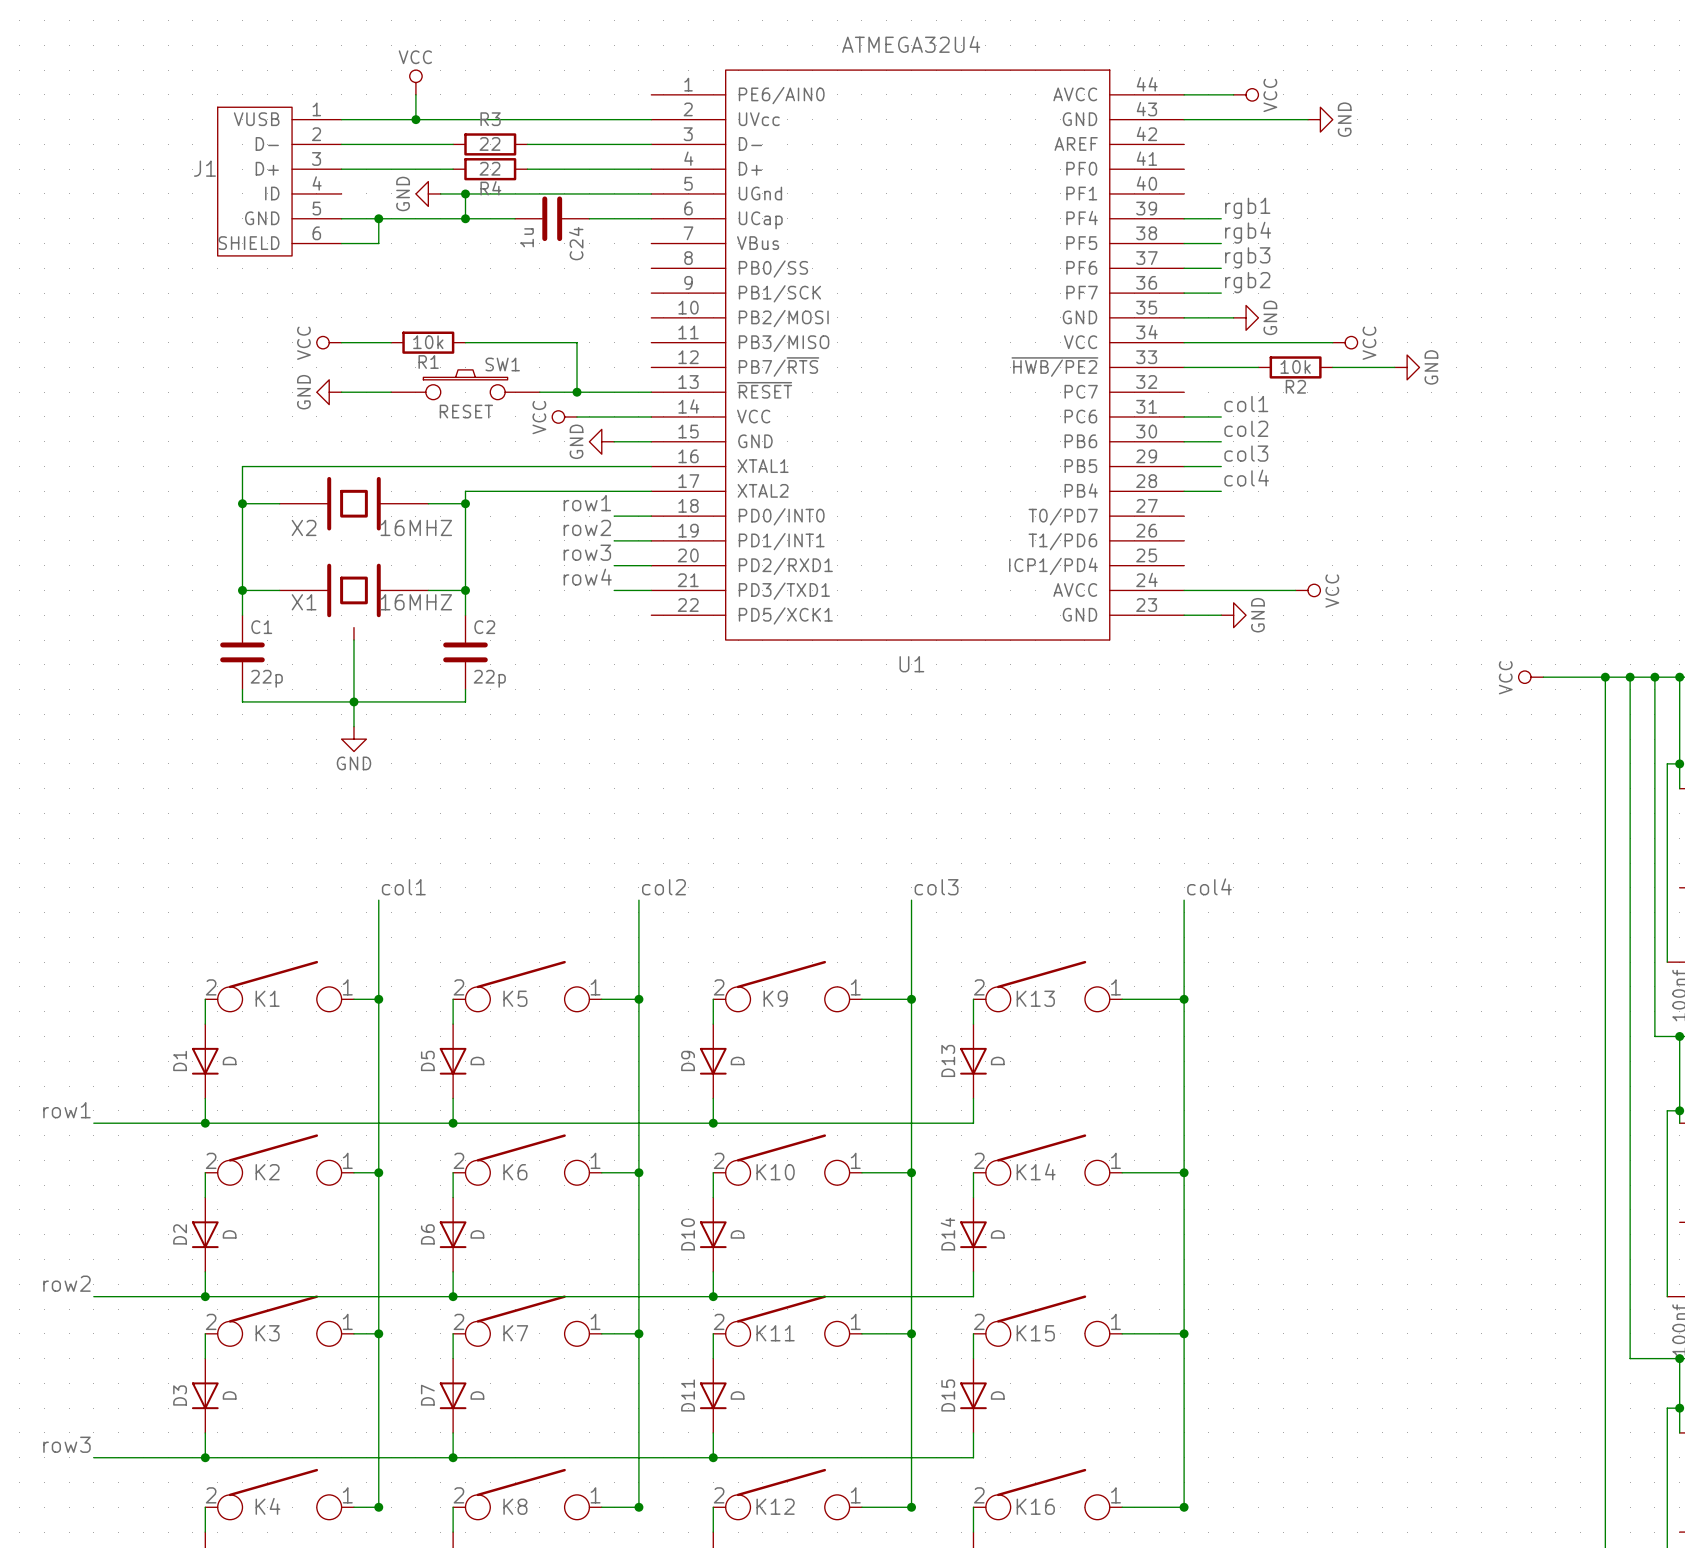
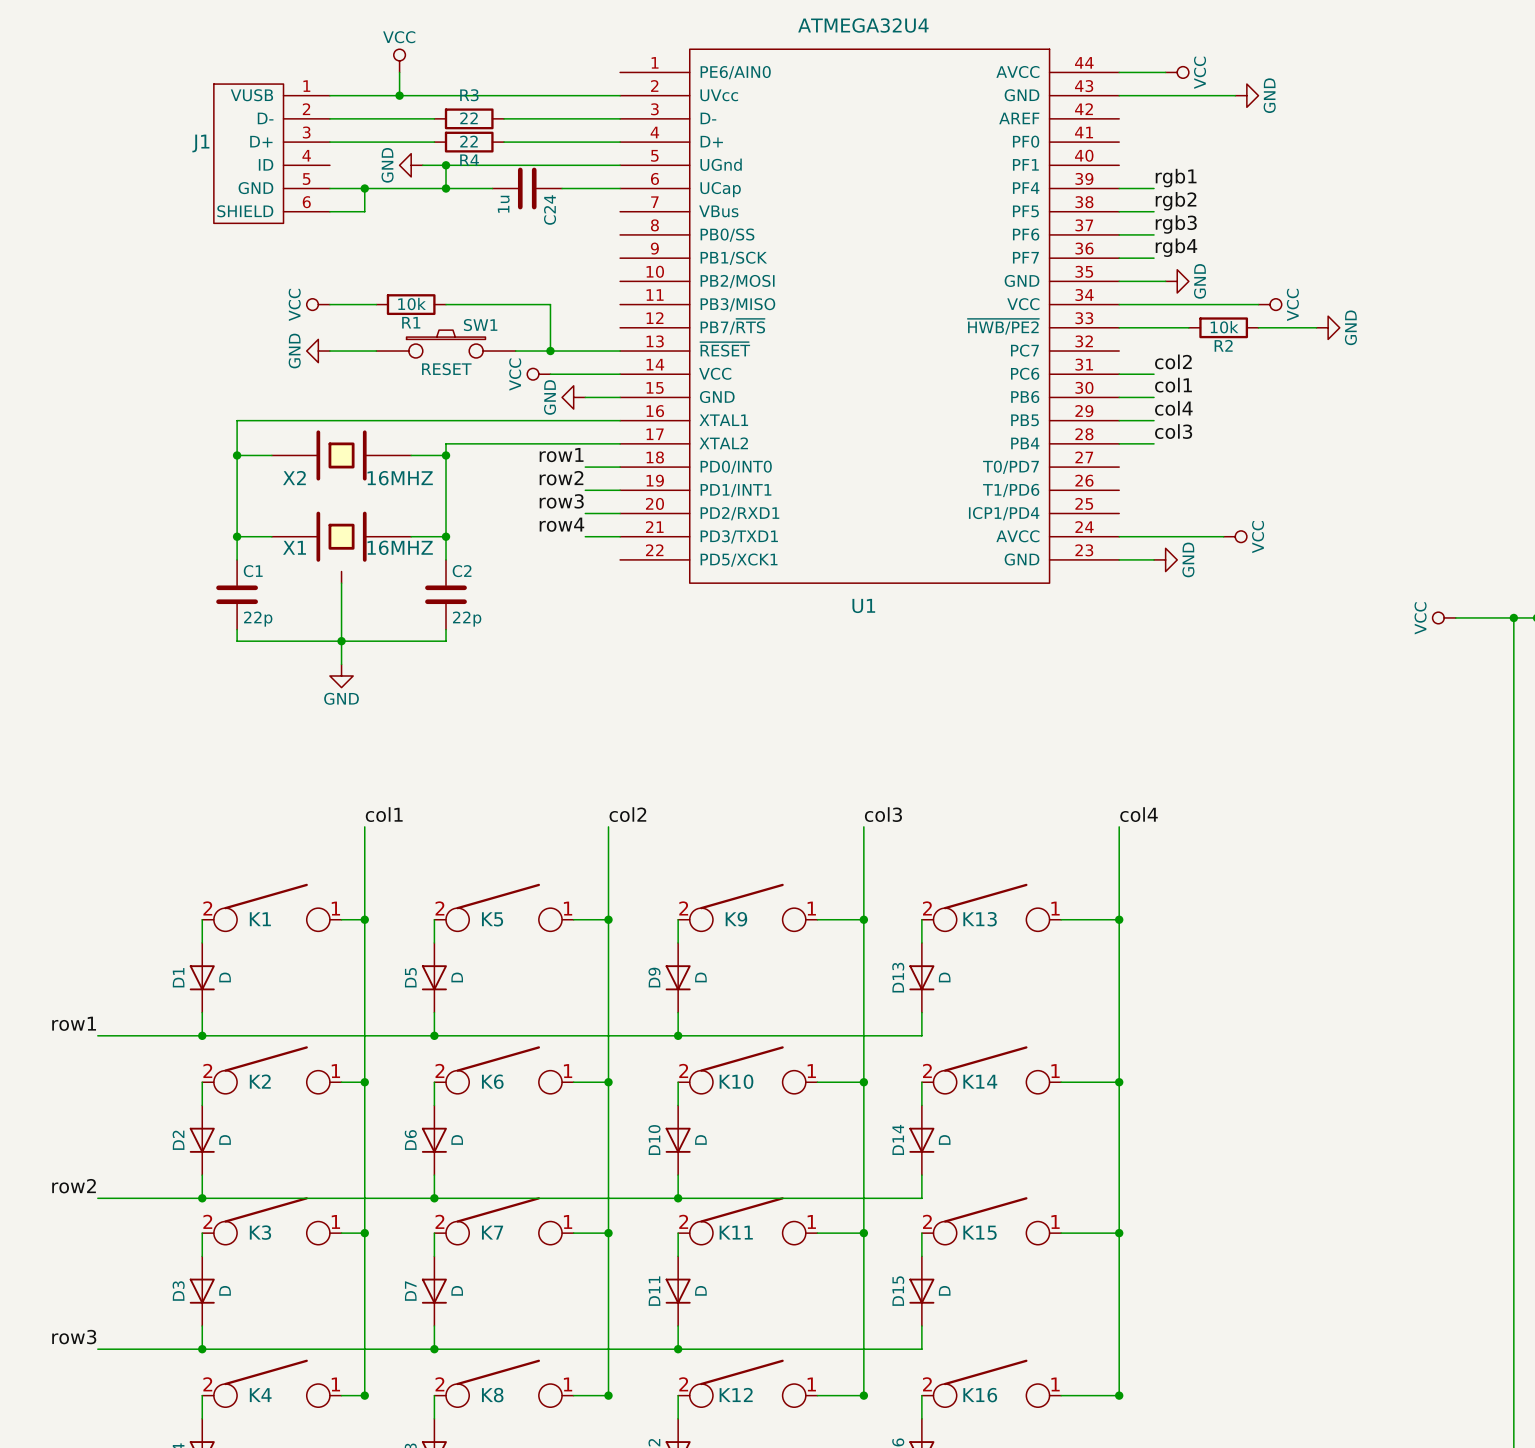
label: rgb4 (1248, 232) -> rgb2 (1176, 201)
label: rgb2 (1247, 282) -> rgb4 (1176, 247)
label: col1 (1246, 404) -> col2 (1173, 361)
label: col2 (1246, 428) -> col1 (1173, 385)
label: col3 (1246, 453) -> col4 (1173, 408)
label: col4 (1246, 478) -> col3 (1173, 431)

